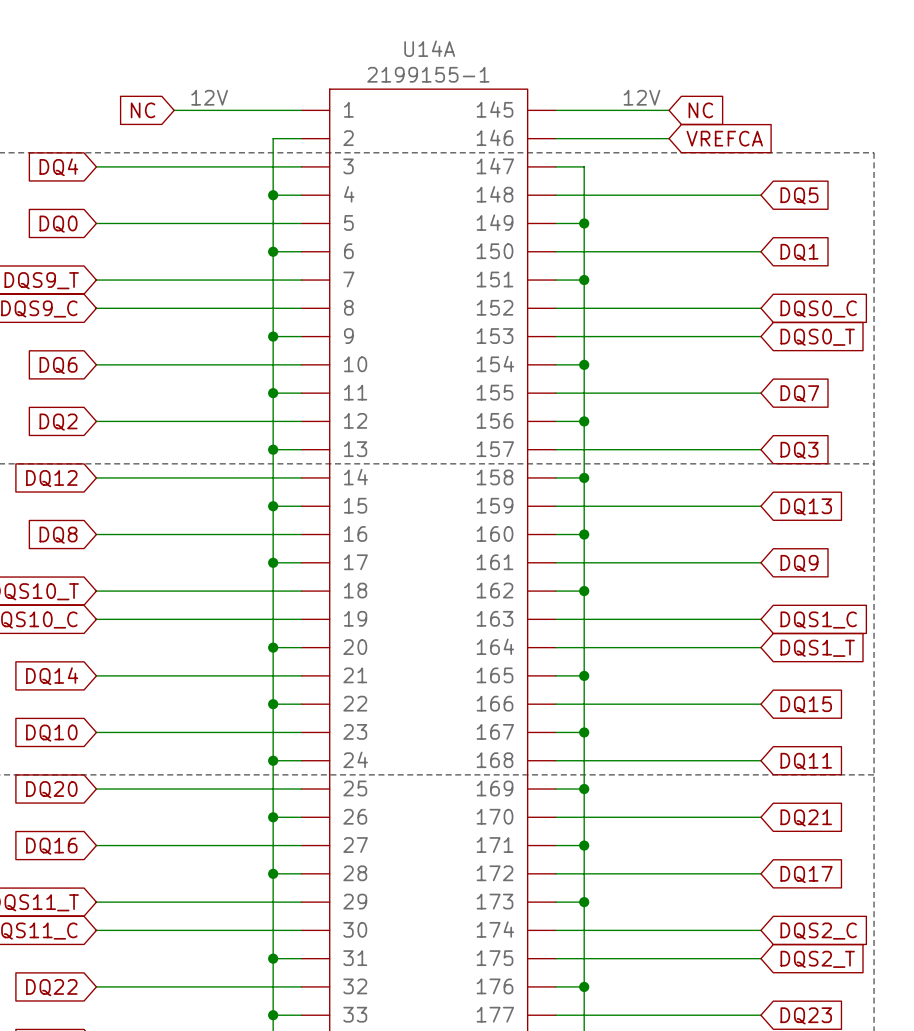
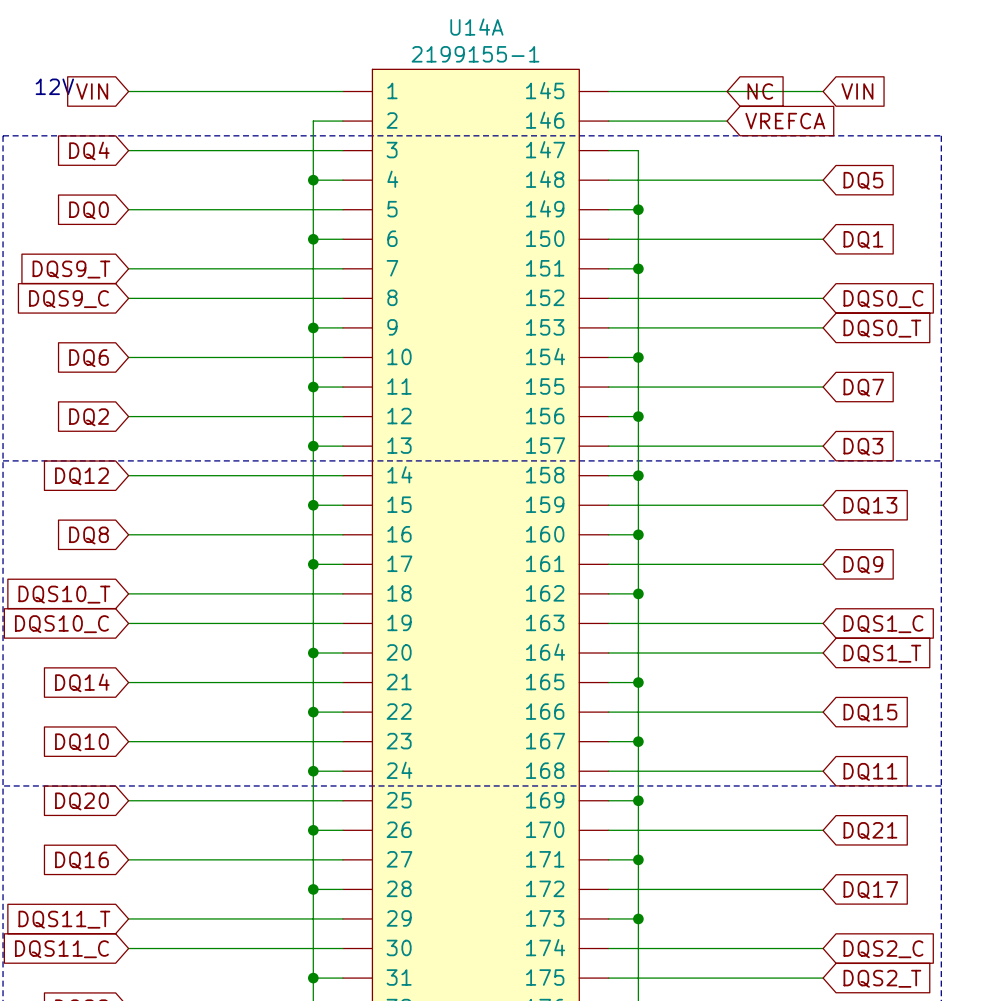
label: 12V (209, 97) -> none
label: 12V (641, 97) -> none
text: none -> 12V (54, 86)
global label: none -> VIN (92, 91)
wire: none -> (128, 91) (209, 91)
global label: NC (143, 110) -> none
wire: none -> (727, 91) (823, 91)
global label: none -> VIN (857, 91)

